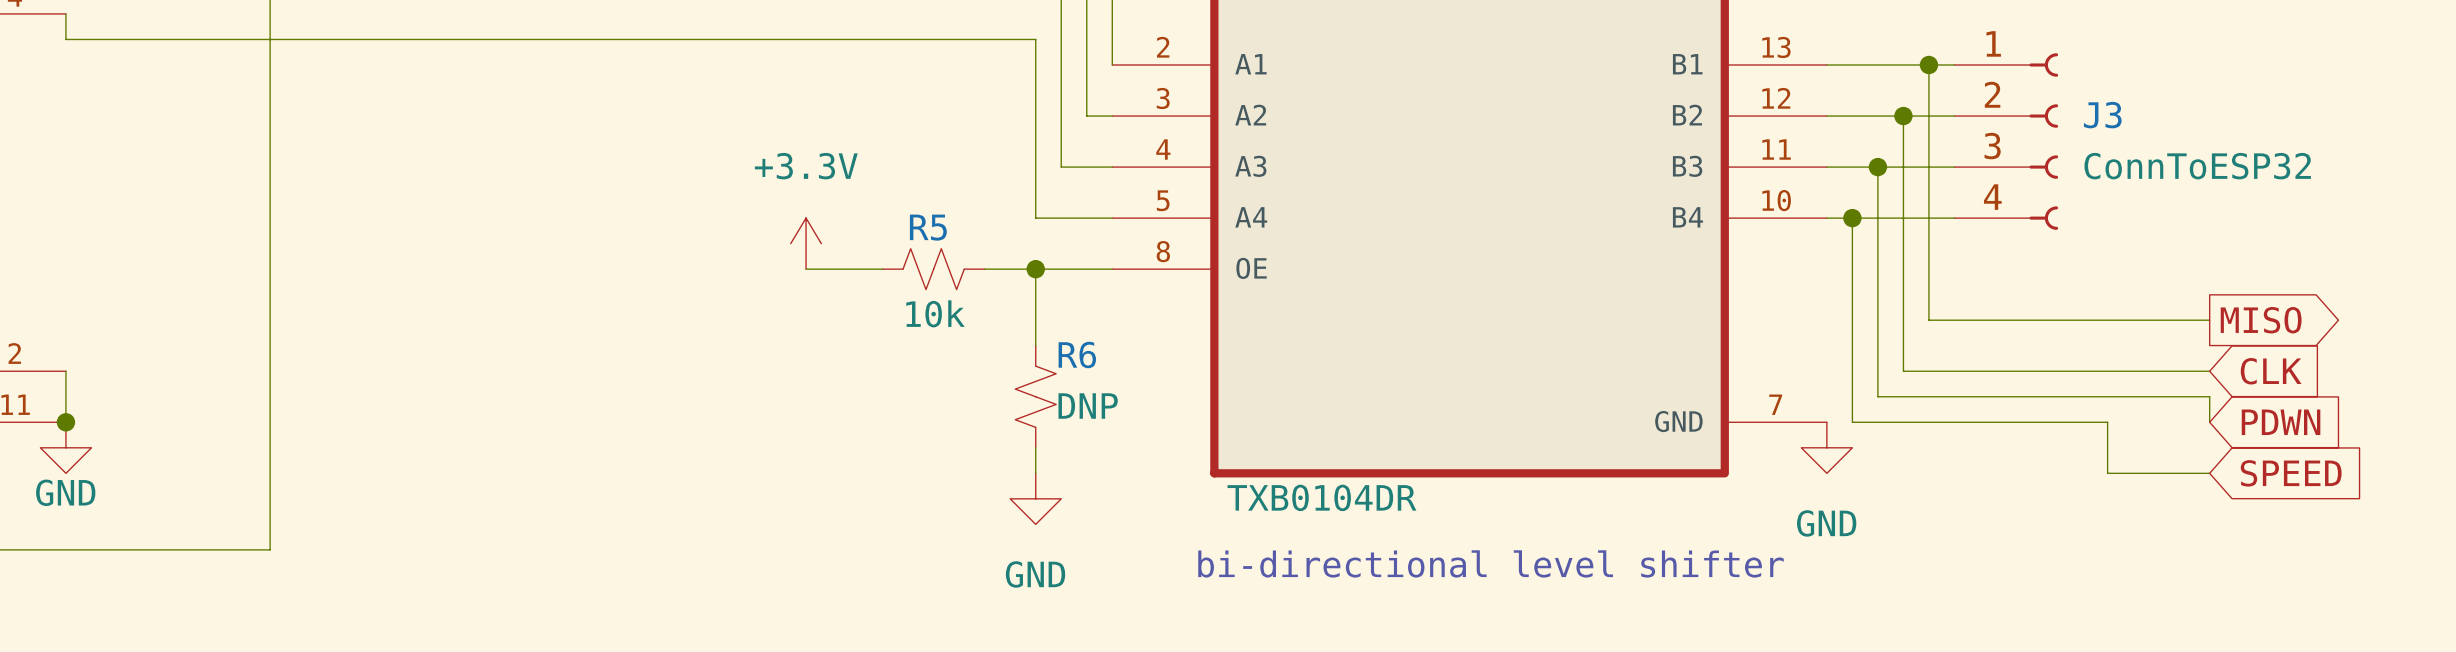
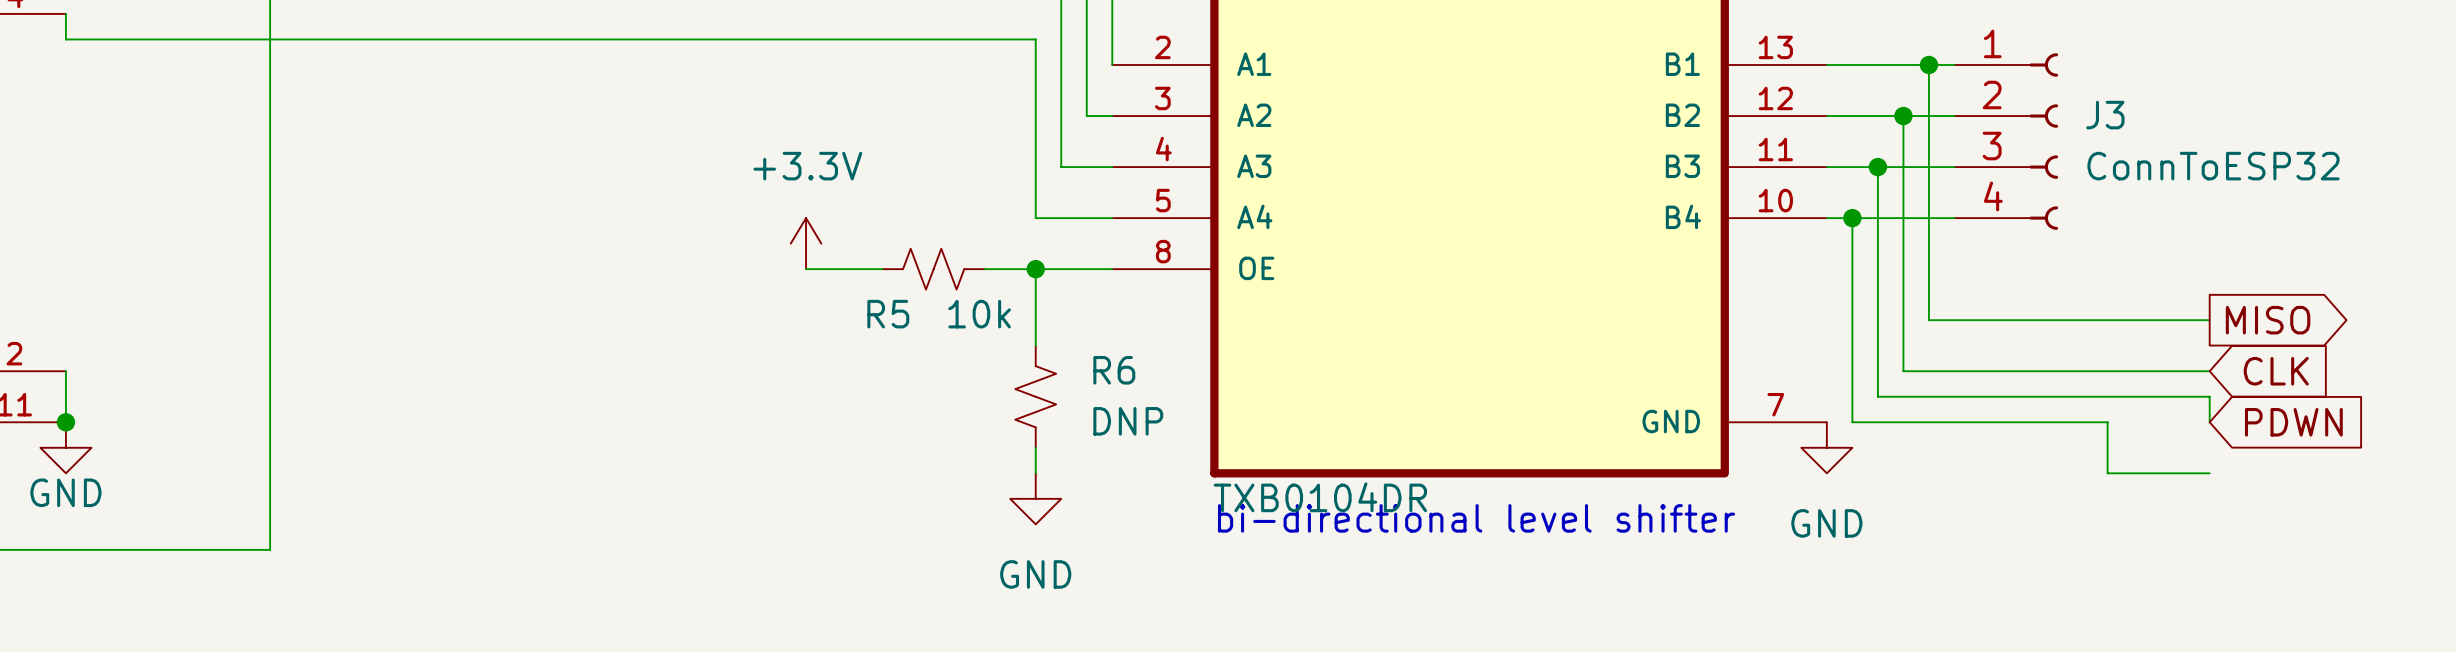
R5 name position: R5 (928, 227) -> R5 (888, 314)
R5 value position: 10k (935, 313) -> 10k (979, 314)
R6 name position: R6 (1077, 354) -> R6 (1114, 370)
R6 value position: DNP (1088, 406) -> DNP (1128, 421)
global label: SPEED (2291, 473) -> none
text position: bi-directional level shifter (1490, 563) -> bi-directional level shifter (1476, 518)

